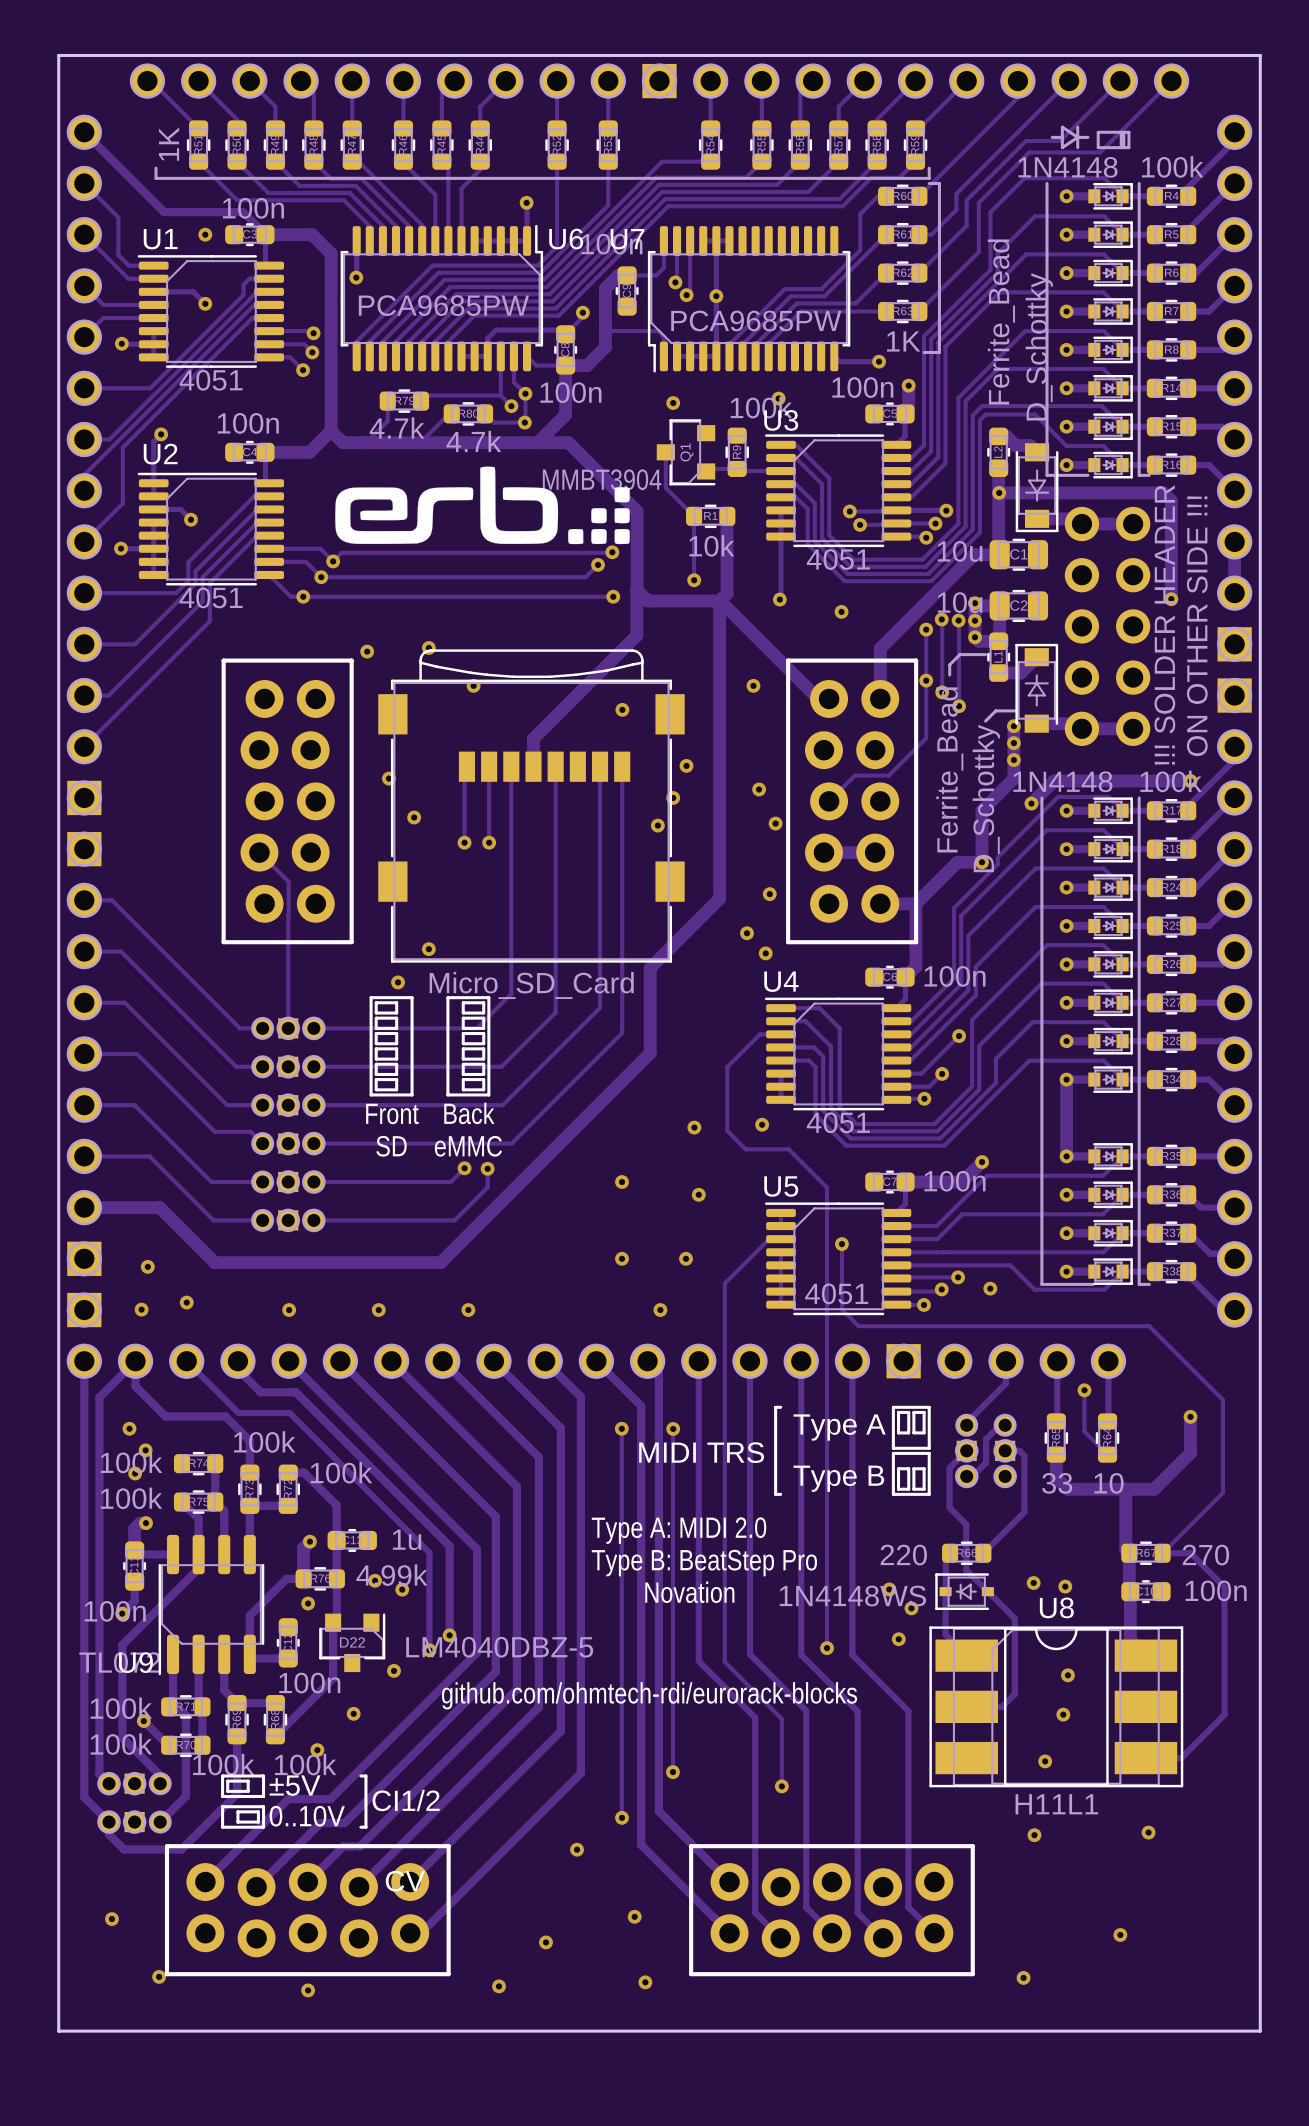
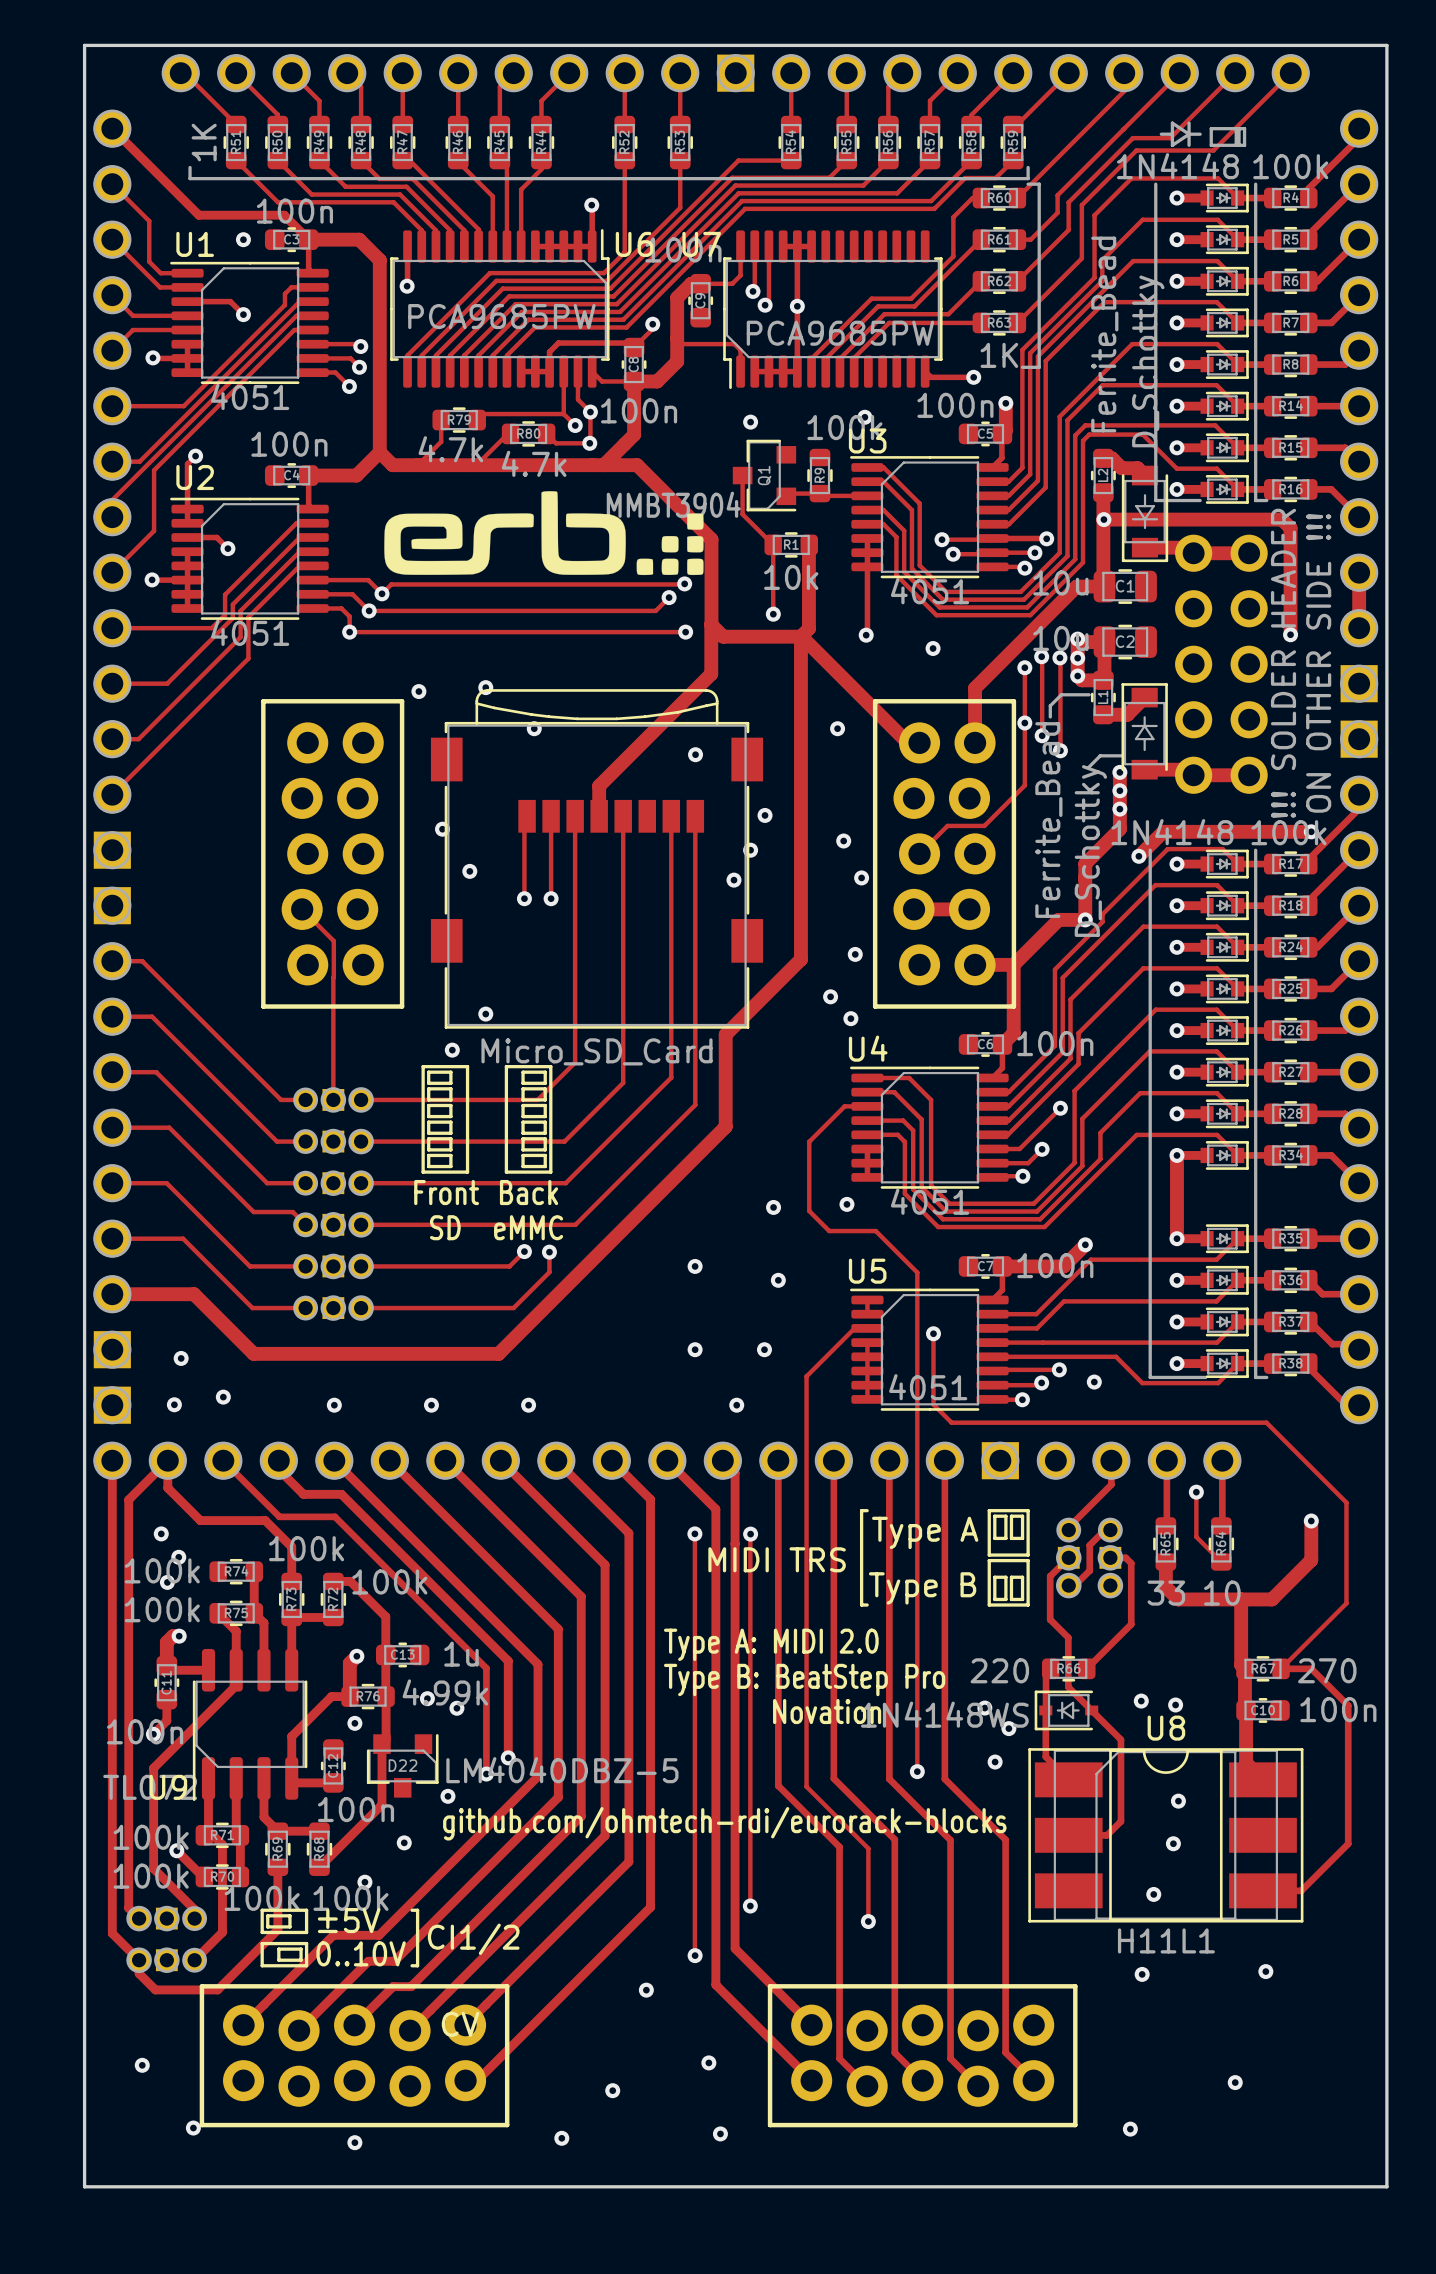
track: (269, 574) (290, 596) (303, 596) -> (312, 608) (341, 608) (349, 616) (349, 632)

